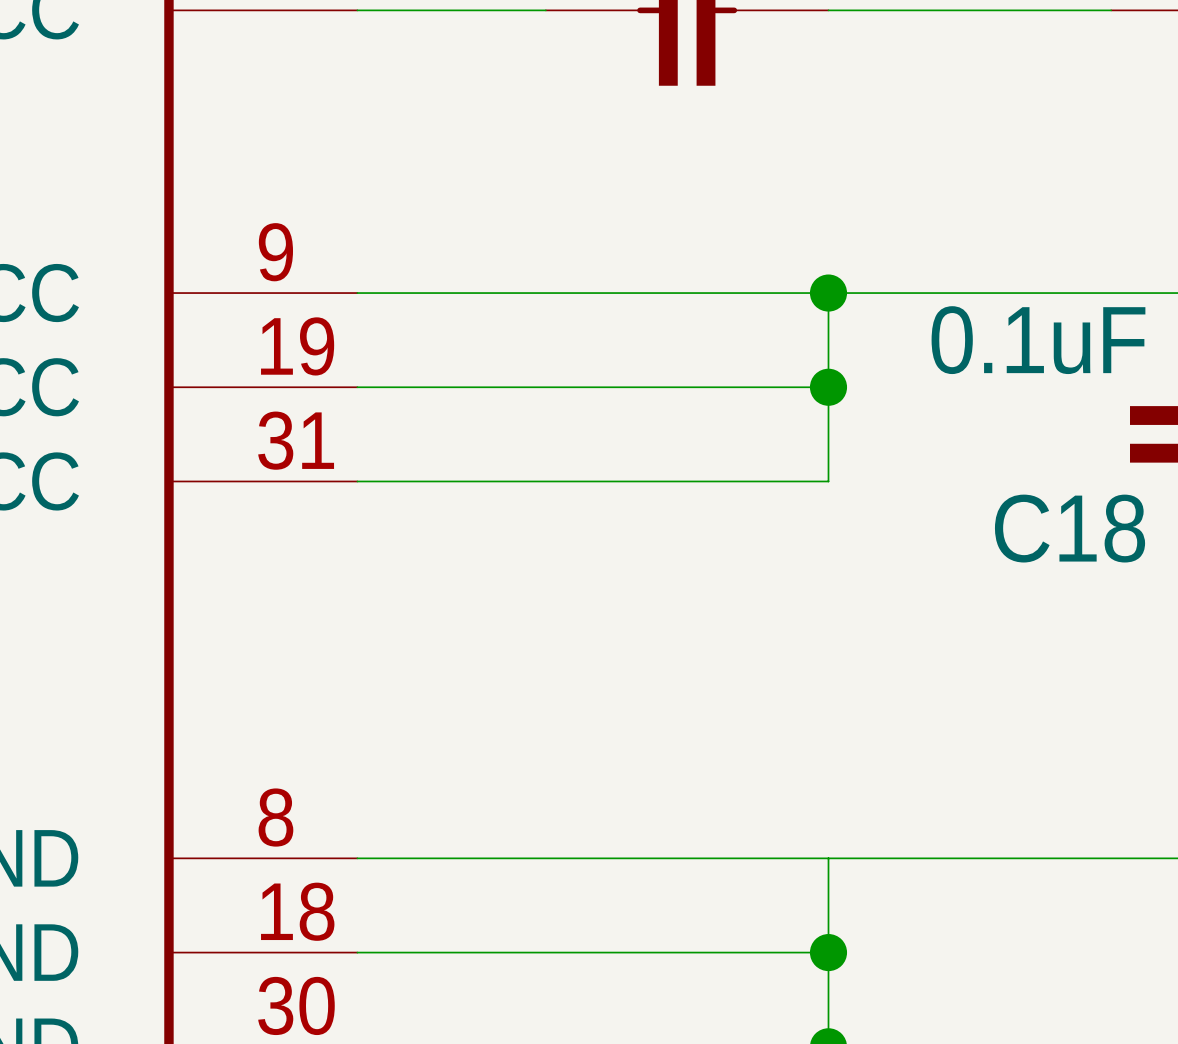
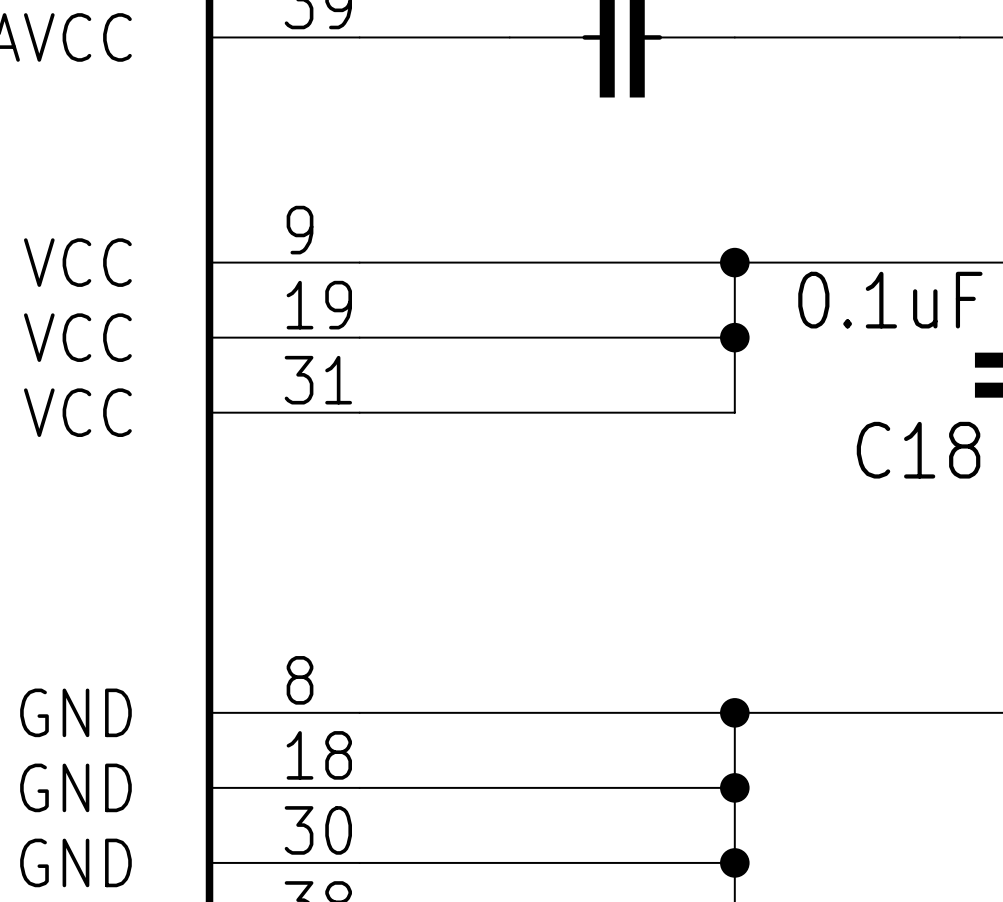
junction: none -> (734, 712)

